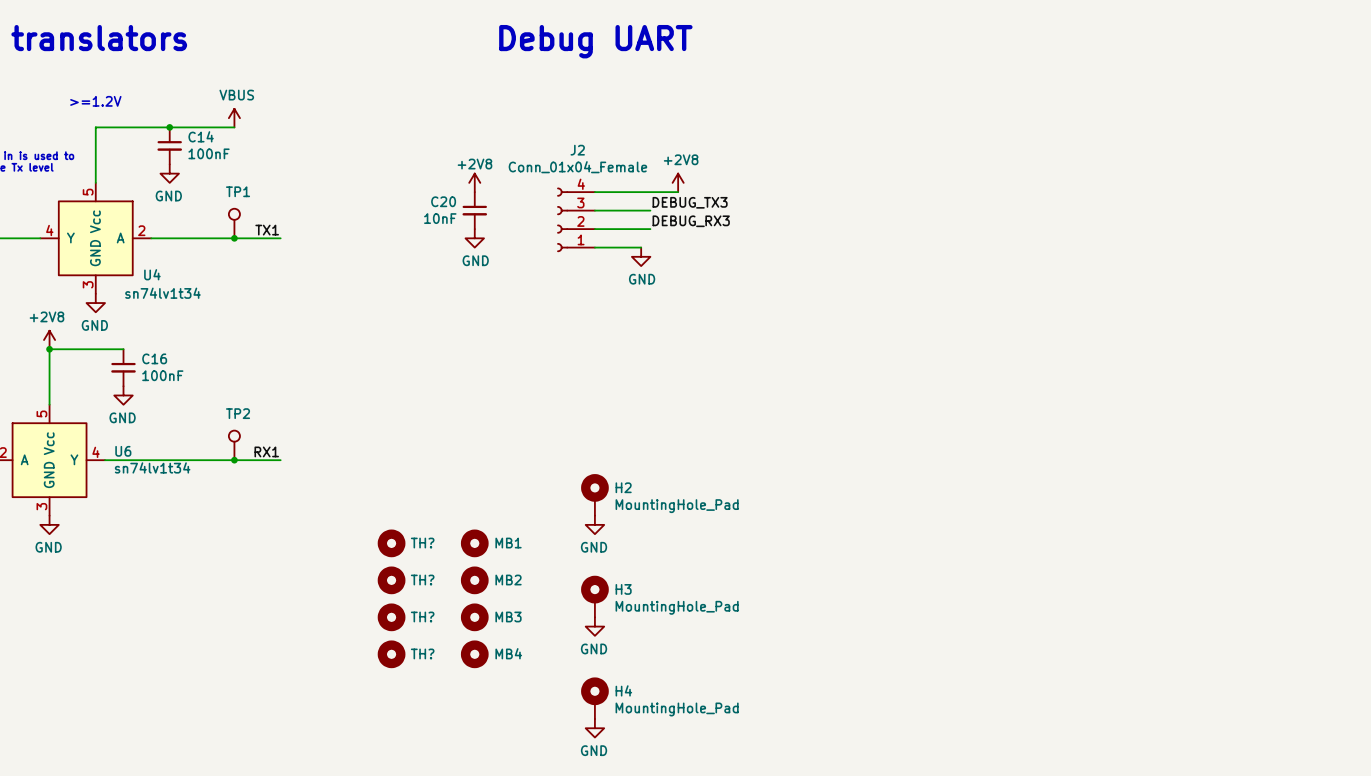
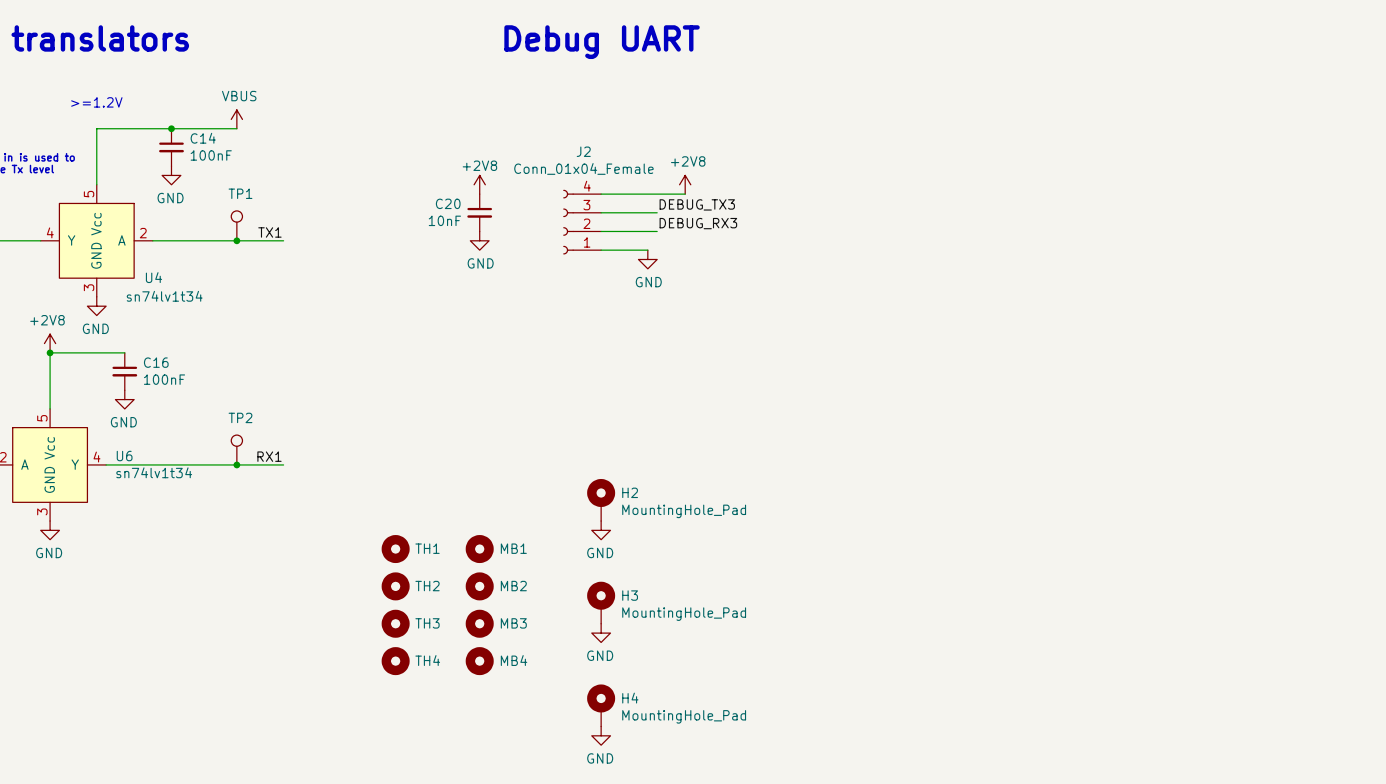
TH? name: TH? (422, 543) -> TH1 (427, 548)
TH? name: TH? (422, 580) -> TH2 (427, 586)
TH? name: TH? (422, 616) -> TH3 (427, 623)
TH? name: TH? (422, 653) -> TH4 (427, 660)

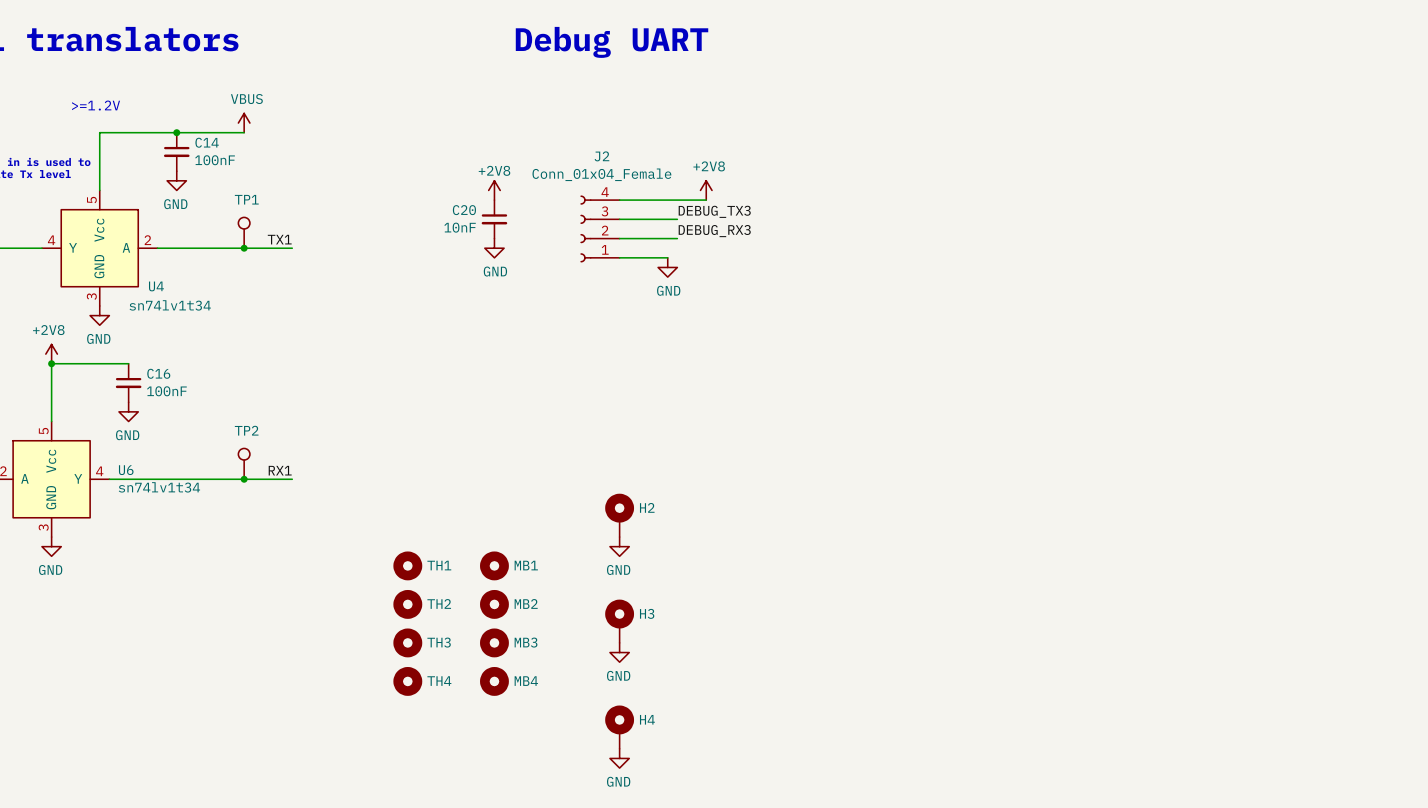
H2 value: MountingHole_Pad (684, 511) -> none
H3 value: MountingHole_Pad (684, 614) -> none
H4 value: MountingHole_Pad (684, 716) -> none

